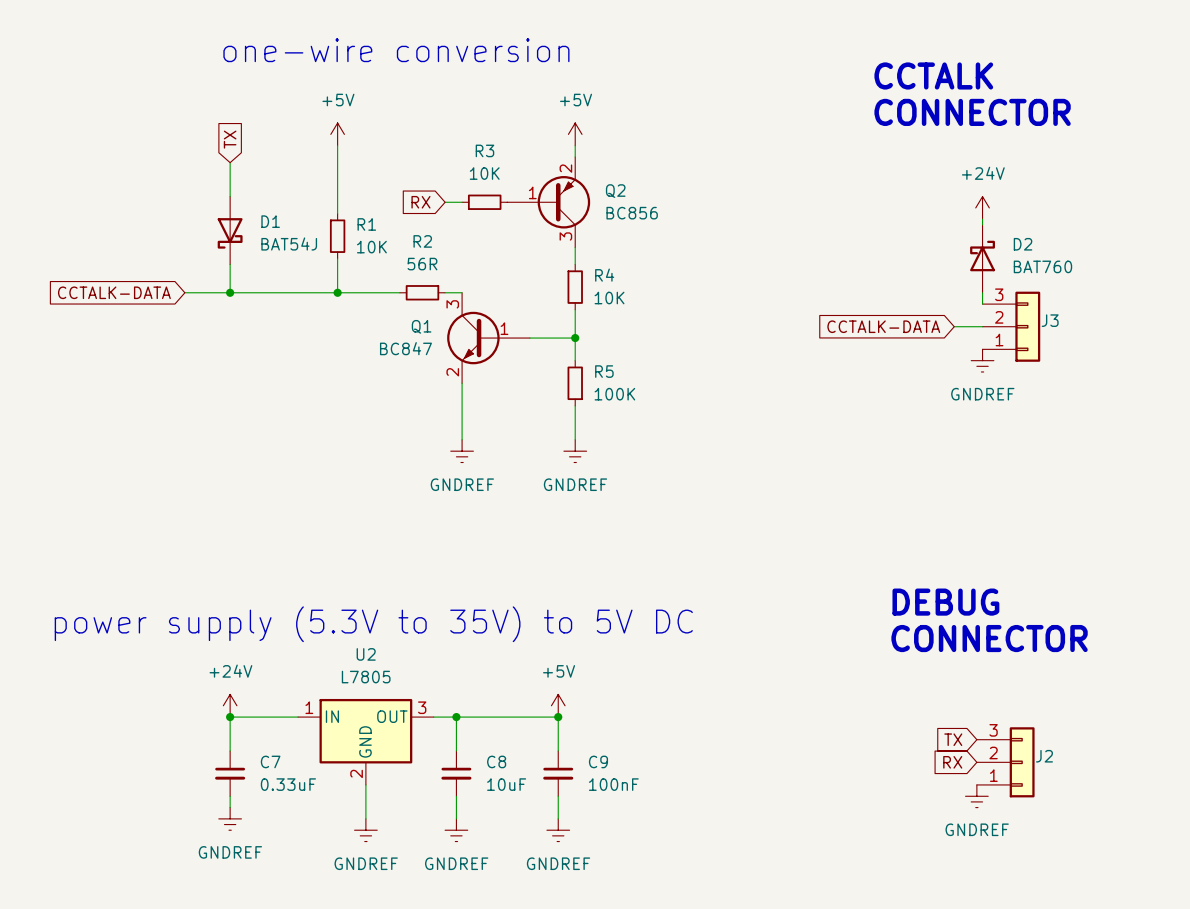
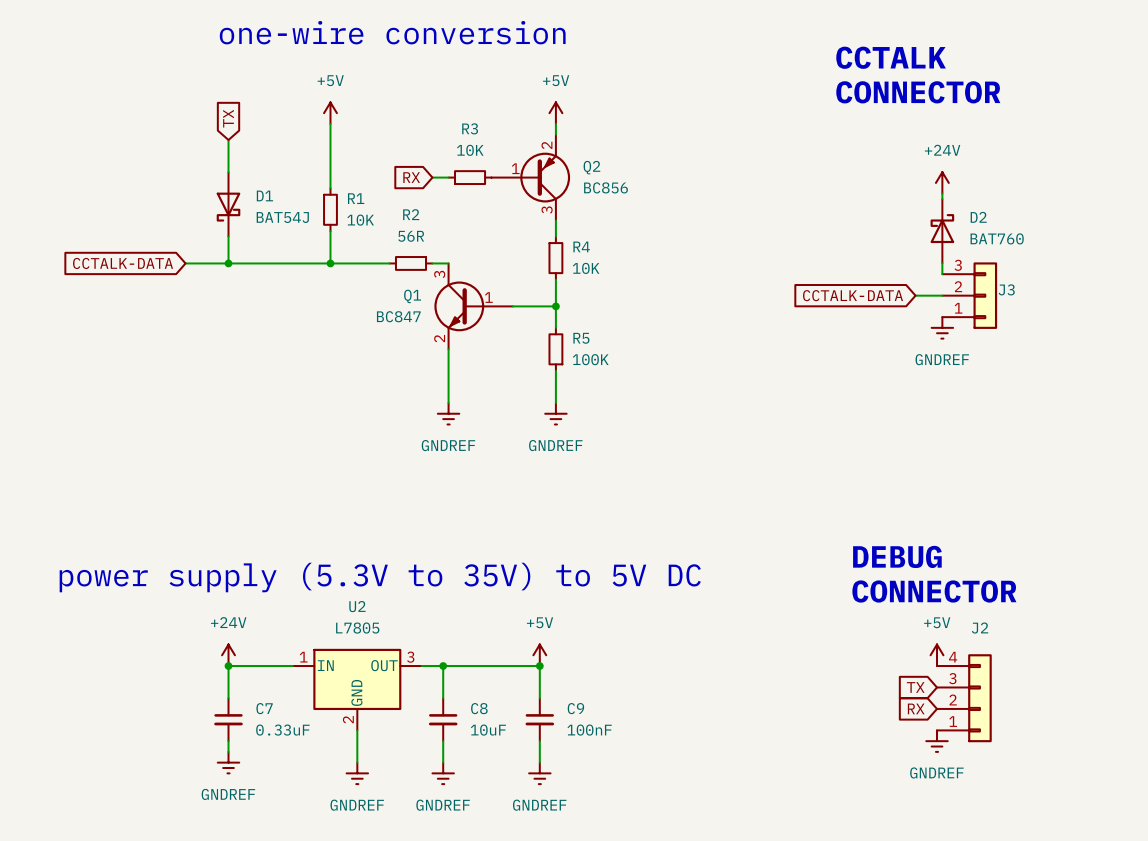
power symbol: none -> +5V (937, 655)
J2 symbol: [976, 727, 1035, 798] -> [937, 654, 992, 743]
J2 name position: J2 (1044, 756) -> J2 (980, 628)

